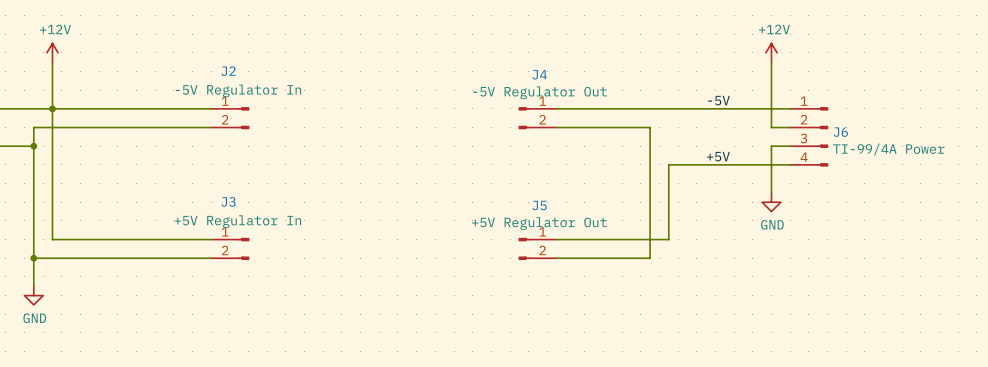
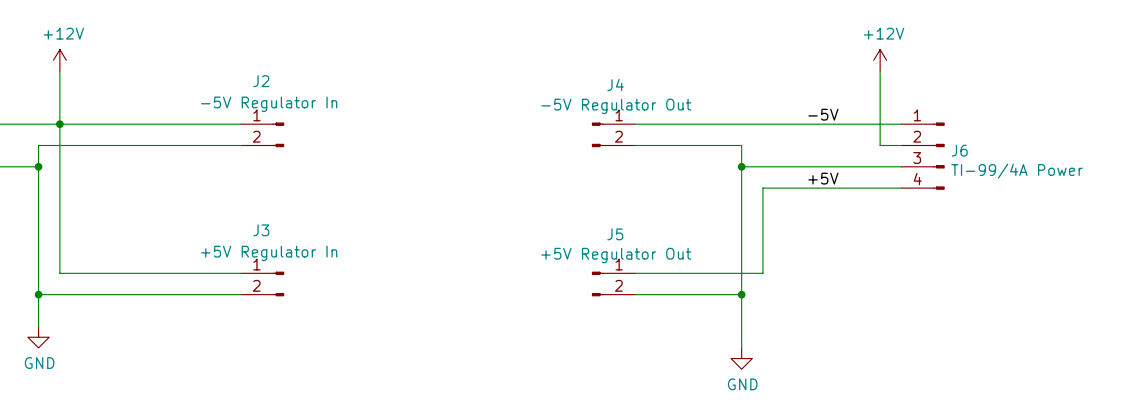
junction: none -> (741, 166)
wire: (771, 146) (771, 192) -> (880, 166) (741, 166)
power symbol position: GND (771, 202) -> GND (741, 358)
wire: none -> (741, 294) (741, 347)
junction: none -> (741, 294)

